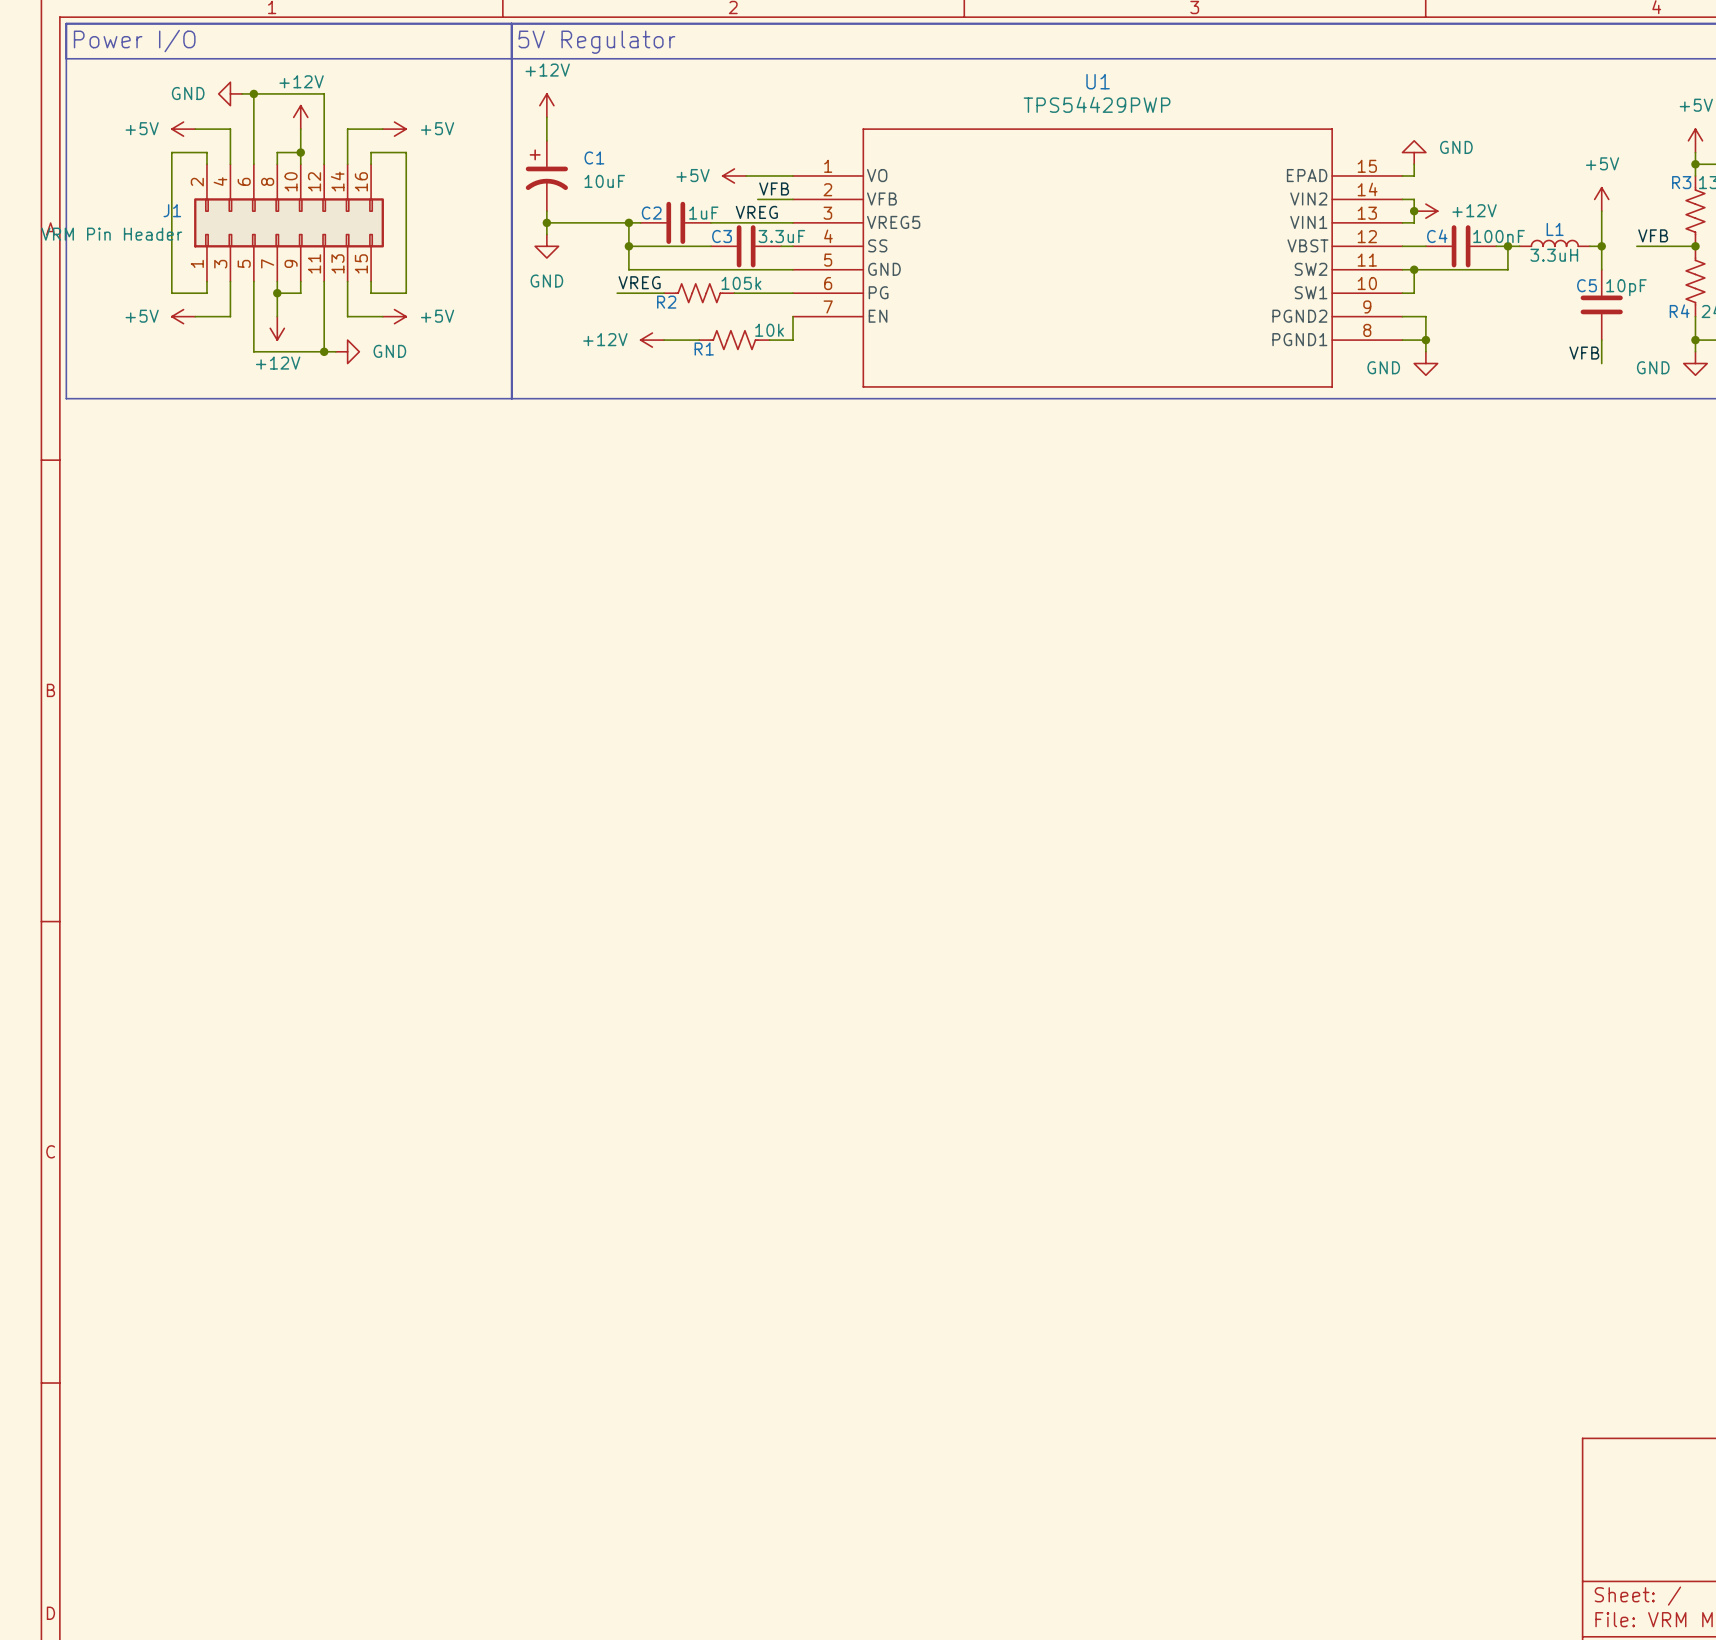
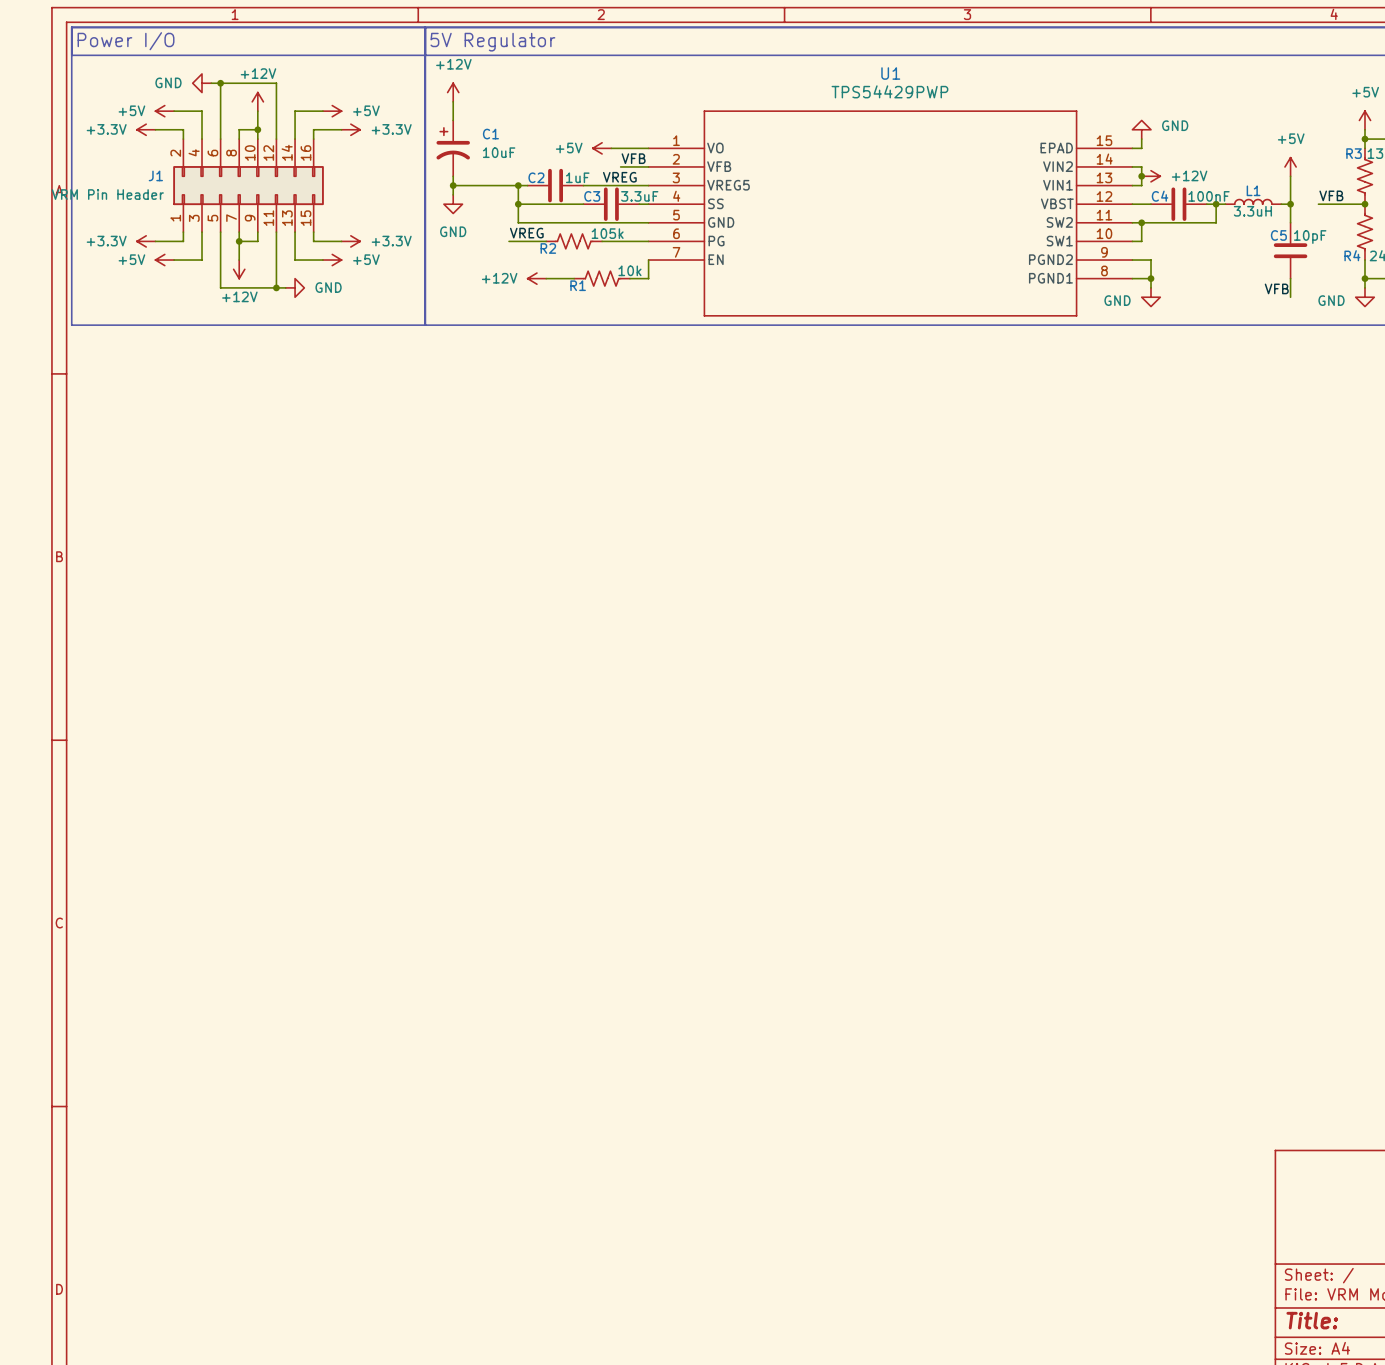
power symbol: none -> +3.3V (146, 129)
wire: (171, 152) (171, 293) -> none
wire: (406, 152) (406, 293) -> none
power symbol: none -> +3.3V (350, 129)
power symbol: none -> +3.3V (146, 241)
power symbol: none -> +3.3V (350, 241)

